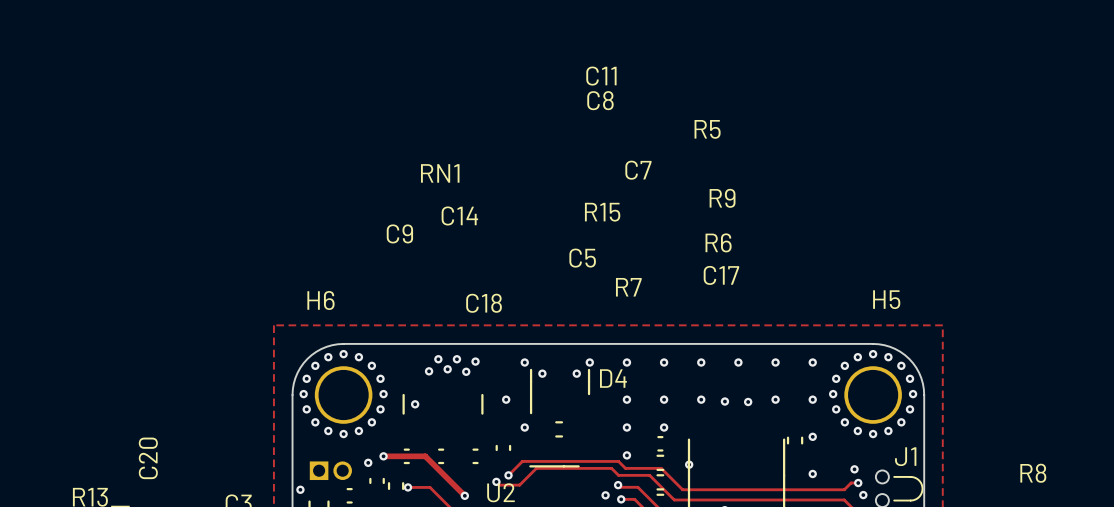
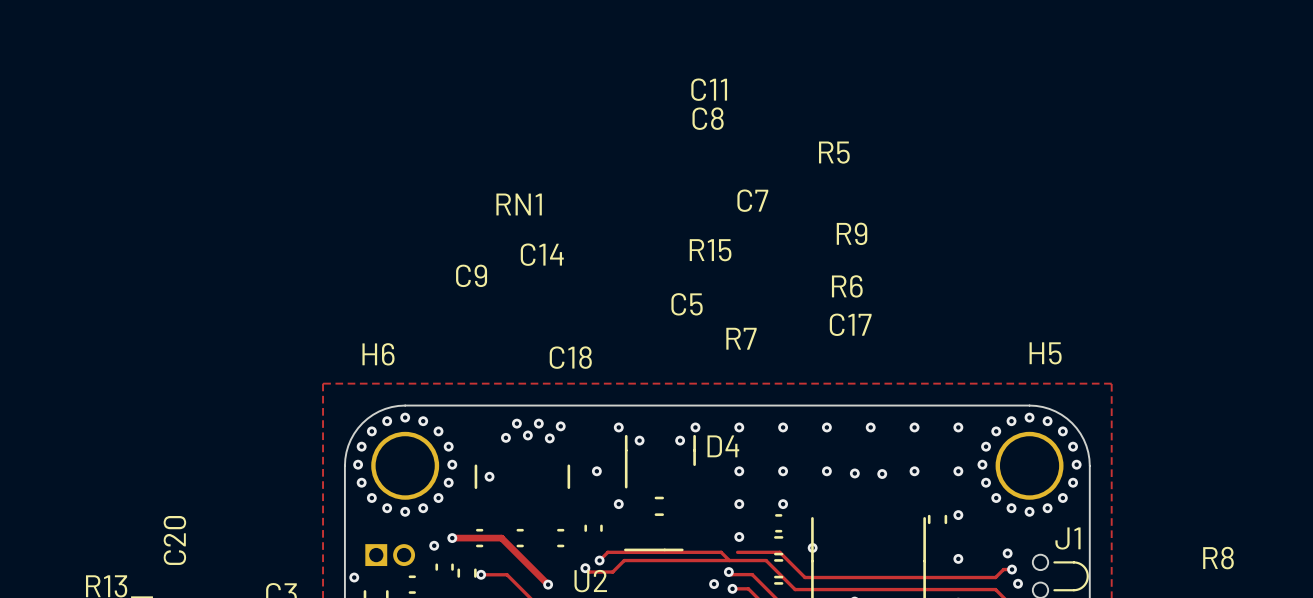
track: (515, 468) (522, 461) (618, 461) (625, 468) -> none
track: (536, 468) (529, 475) -> (632, 552) (607, 552)
track: none -> (624, 560) (729, 560)

